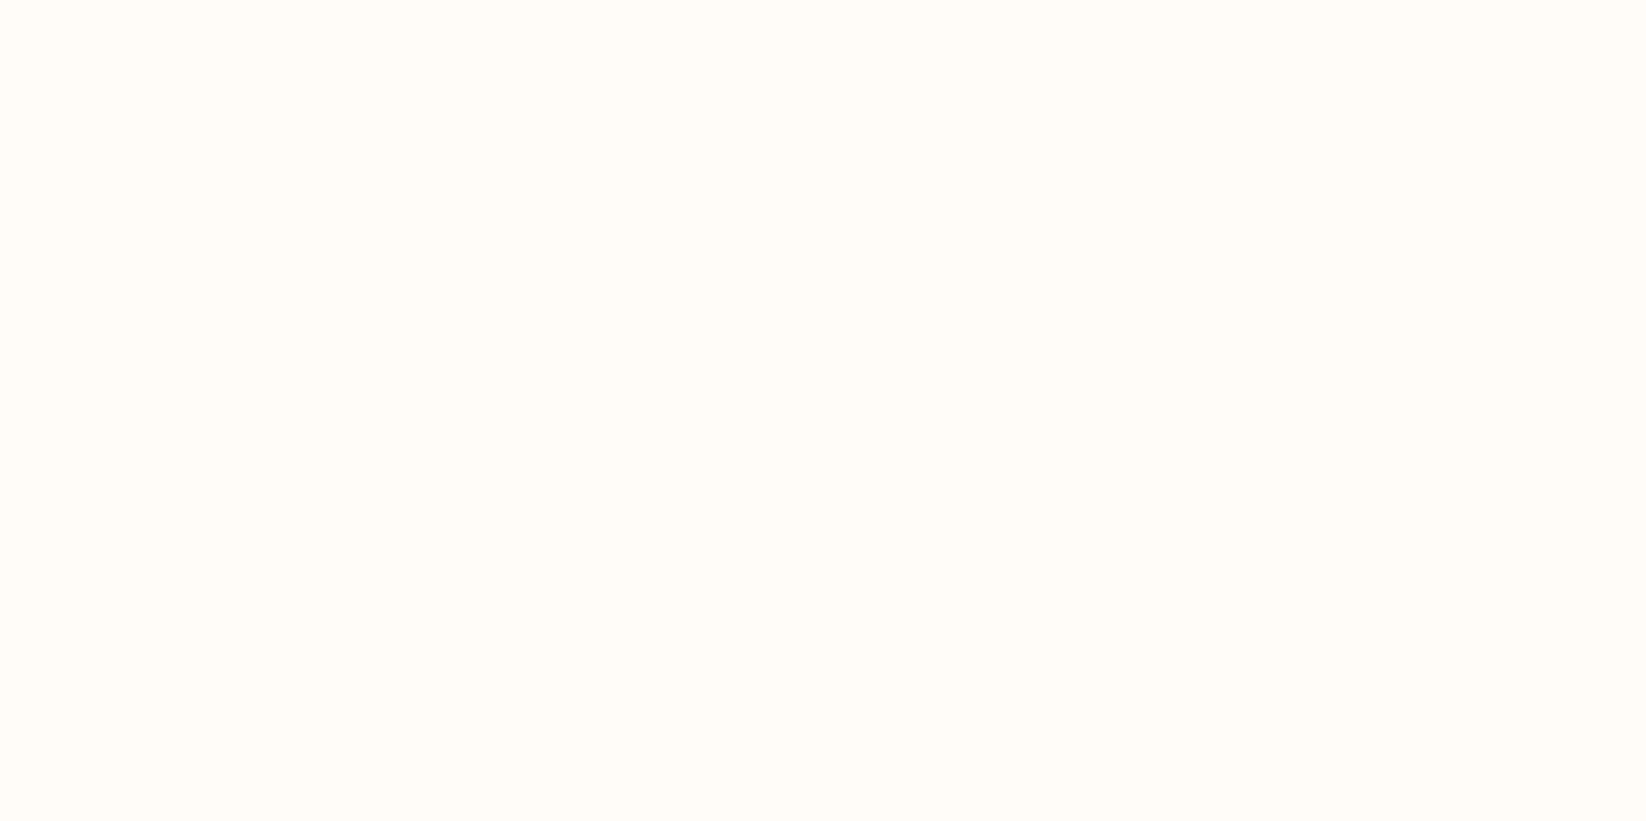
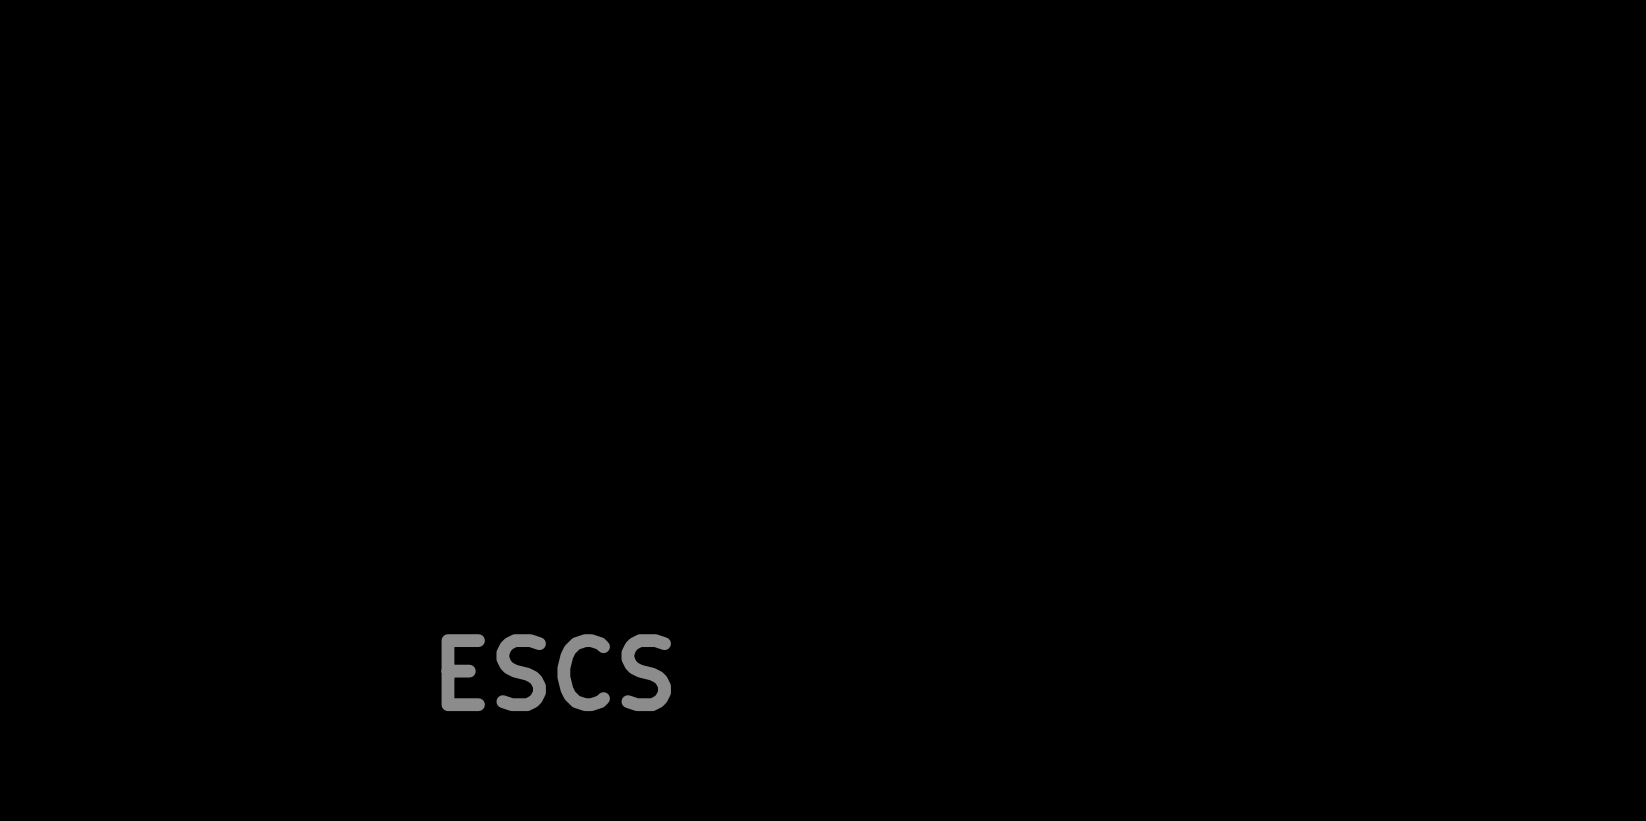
text: none -> ESCS (556, 672)

